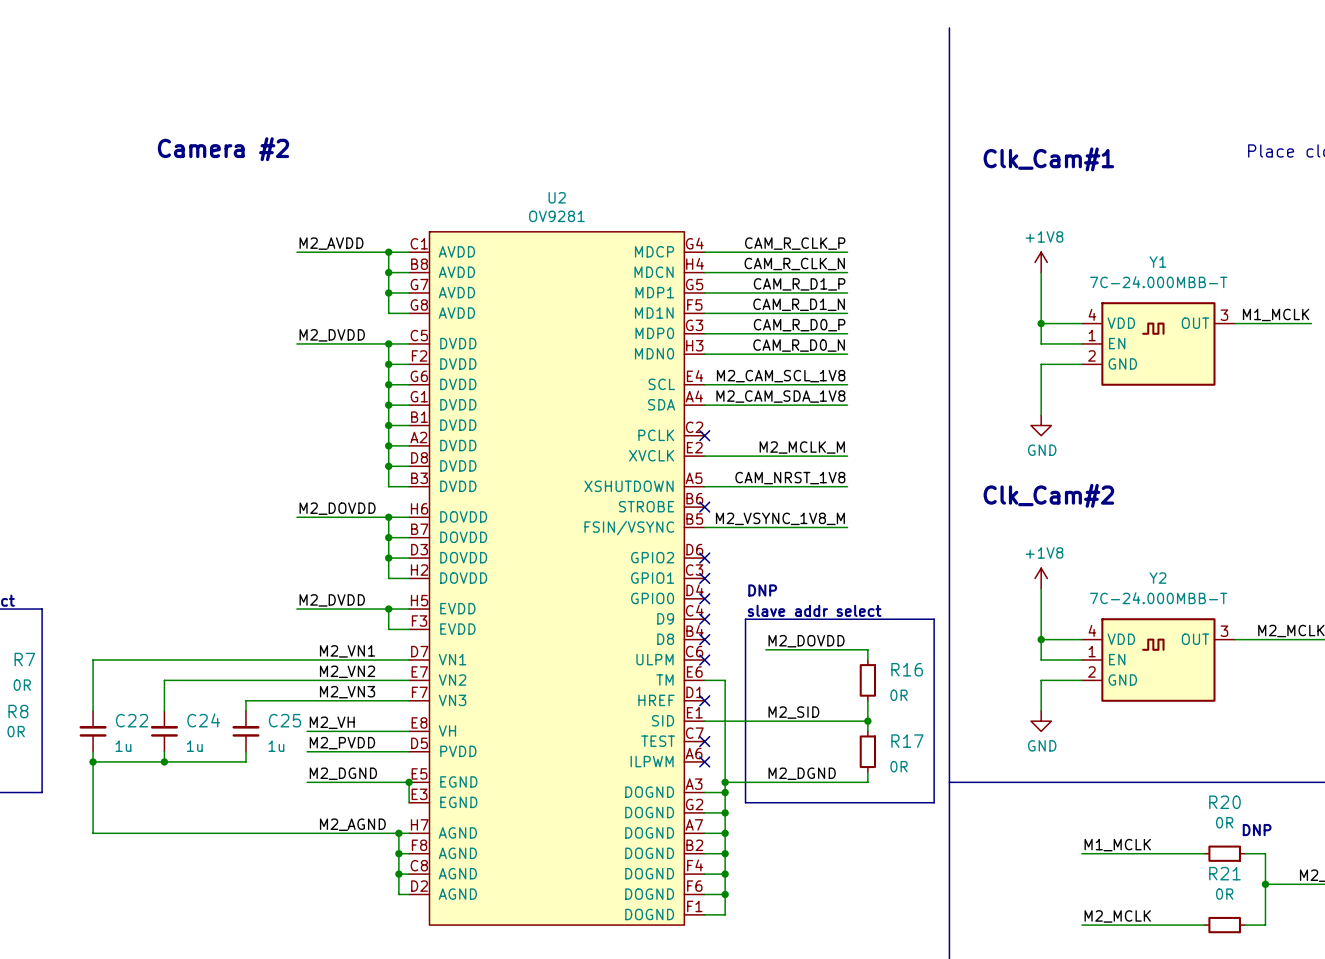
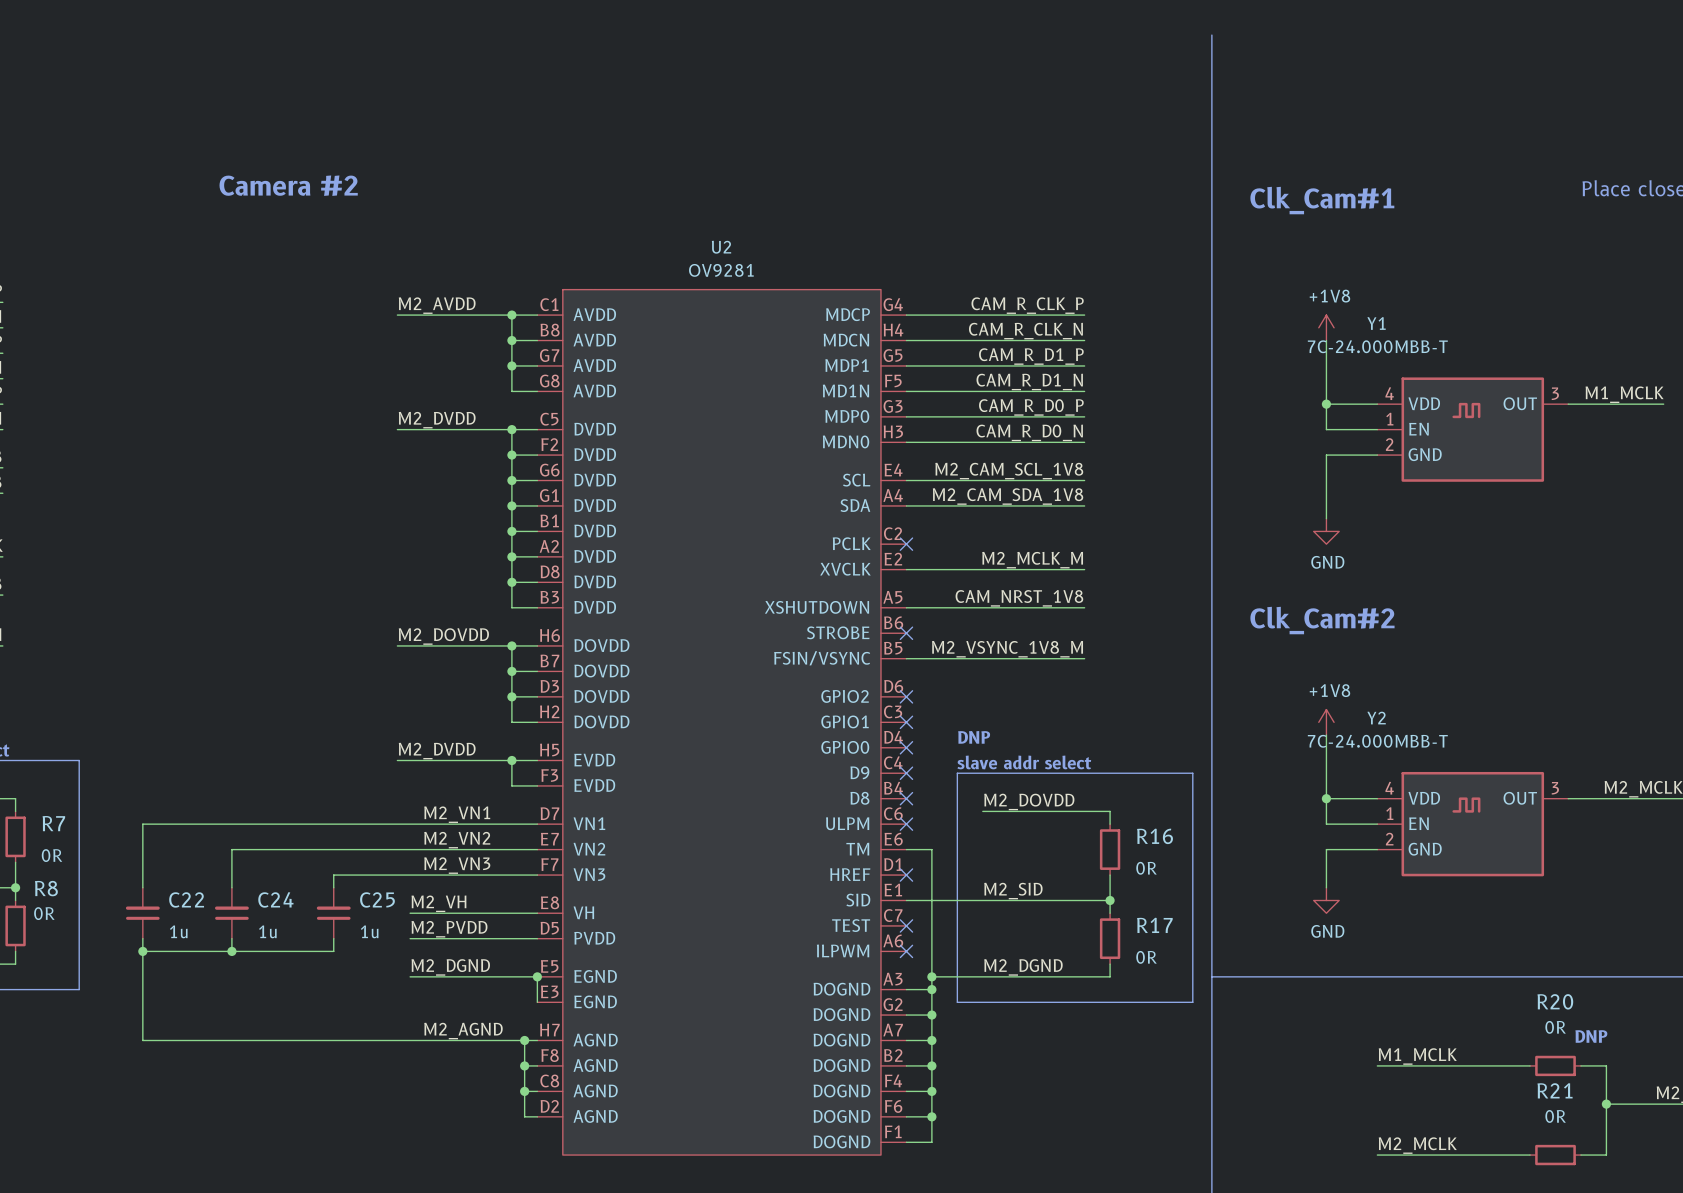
Y1 name position: Y1 (1157, 262) -> Y1 (1376, 323)
Y1 value position: 7C-24.000MBB-T (1158, 282) -> 7C-24.000MBB-T (1377, 346)
Y2 name position: Y2 (1157, 578) -> Y2 (1376, 718)
Y2 value position: 7C-24.000MBB-T (1158, 598) -> 7C-24.000MBB-T (1377, 741)

